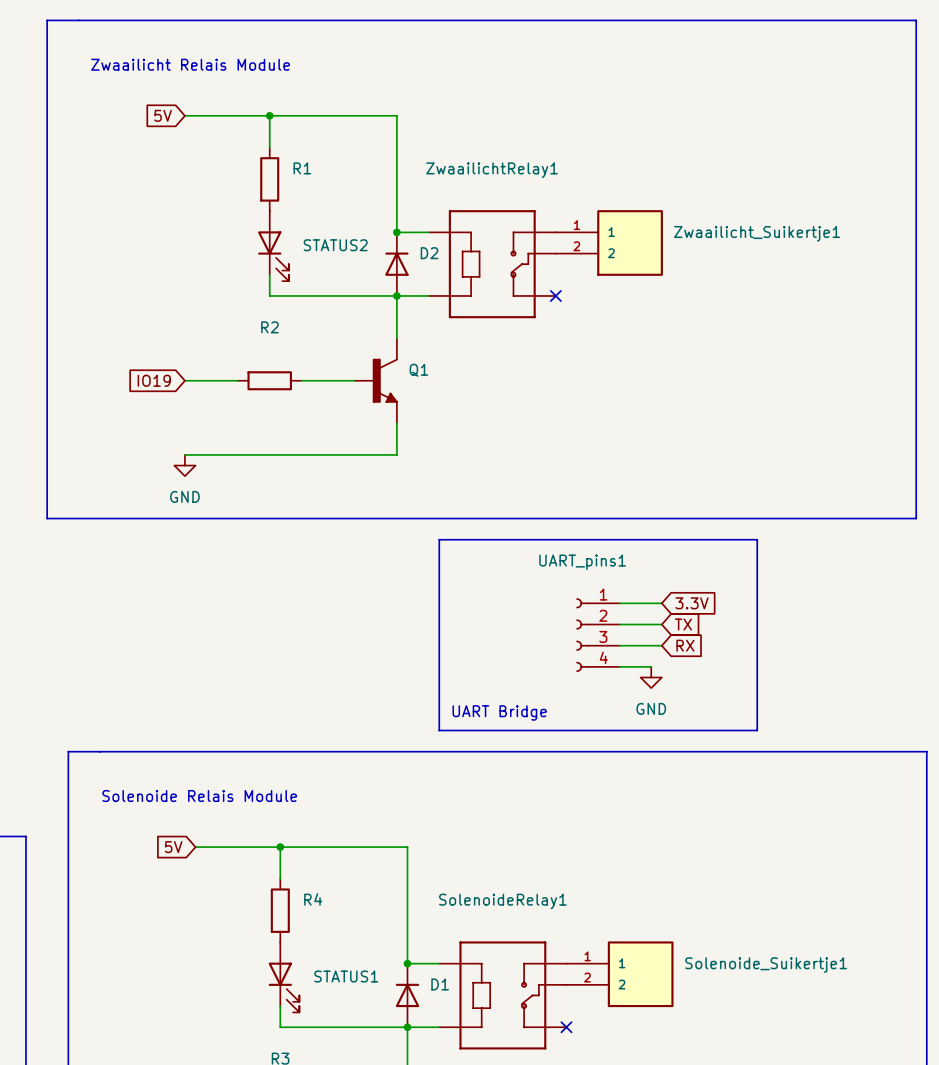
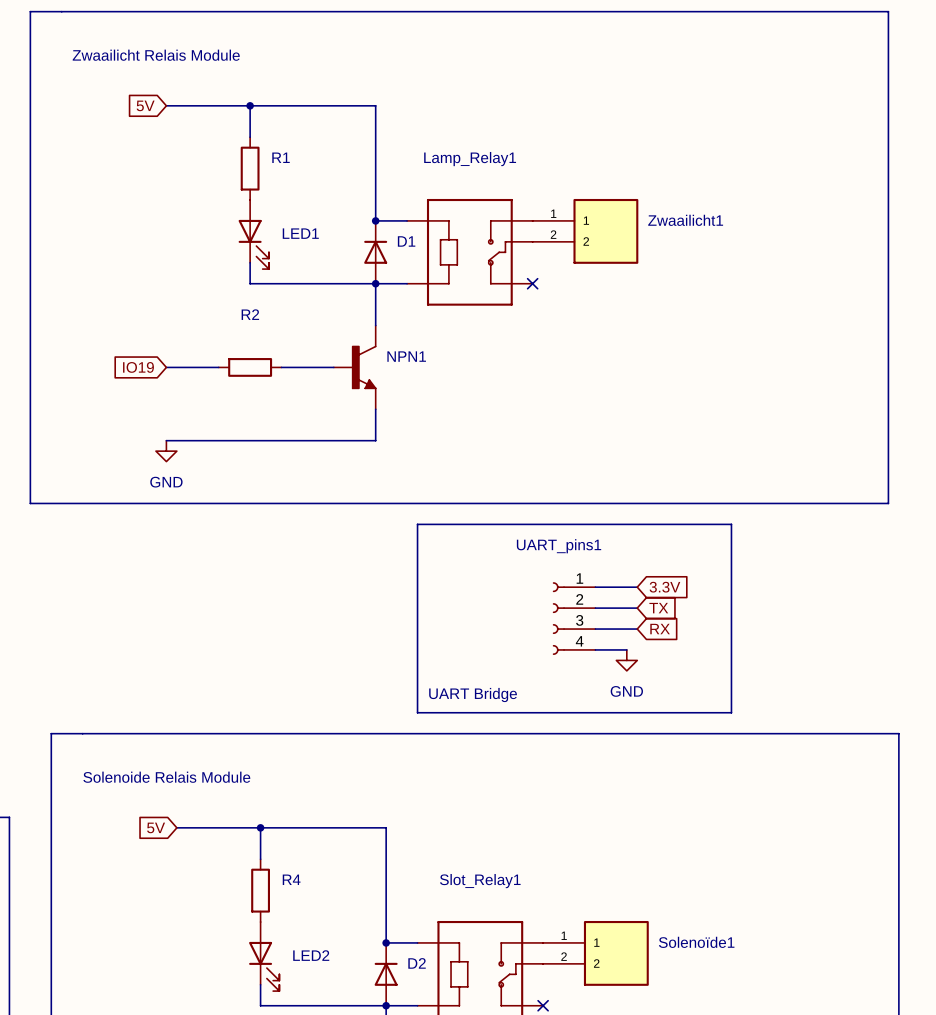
ZwaailichtRelay1 name: ZwaailichtRelay1 (492, 170) -> Lamp_Relay1 (470, 159)
Zwaailicht_Suikertje1 name: Zwaailicht_Suikertje1 (757, 233) -> Zwaailicht1 (685, 220)
STATUS2 name: STATUS2 (335, 245) -> LED1 (300, 233)
D2 name: D2 (429, 253) -> D1 (406, 241)
Q1 name: Q1 (418, 370) -> NPN1 (406, 356)
SolenoideRelay1 name: SolenoideRelay1 (502, 901) -> Slot_Relay1 (480, 881)
Solenoide_Suikertje1 name: Solenoide_Suikertje1 (766, 965) -> Solenoïde1 (696, 942)
STATUS1 name: STATUS1 (346, 976) -> LED2 (311, 955)
D1 name: D1 (440, 984) -> D2 (417, 963)

